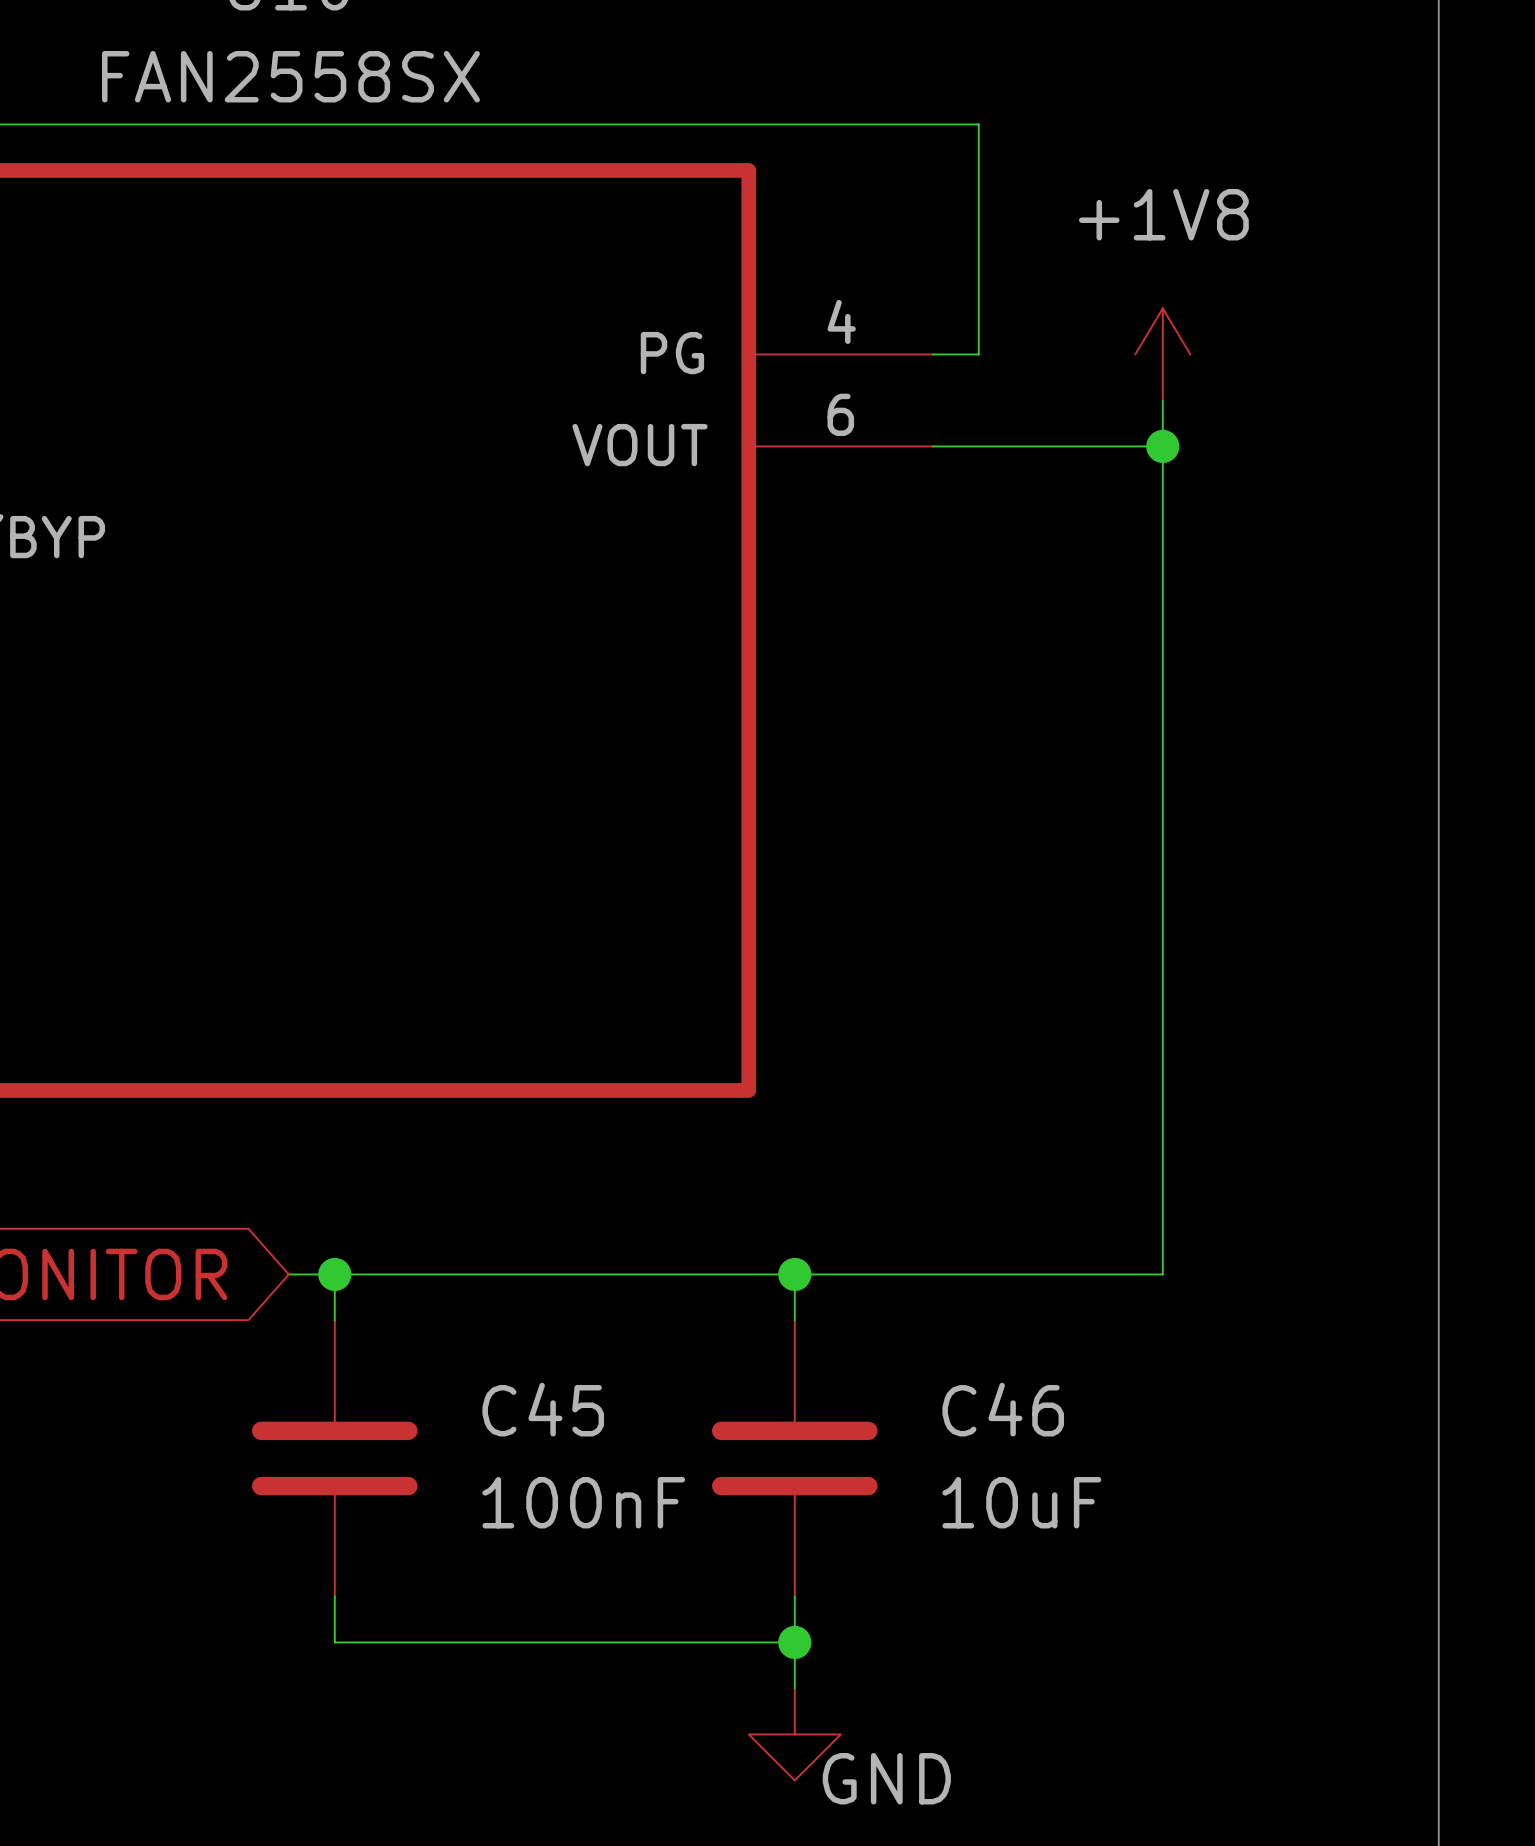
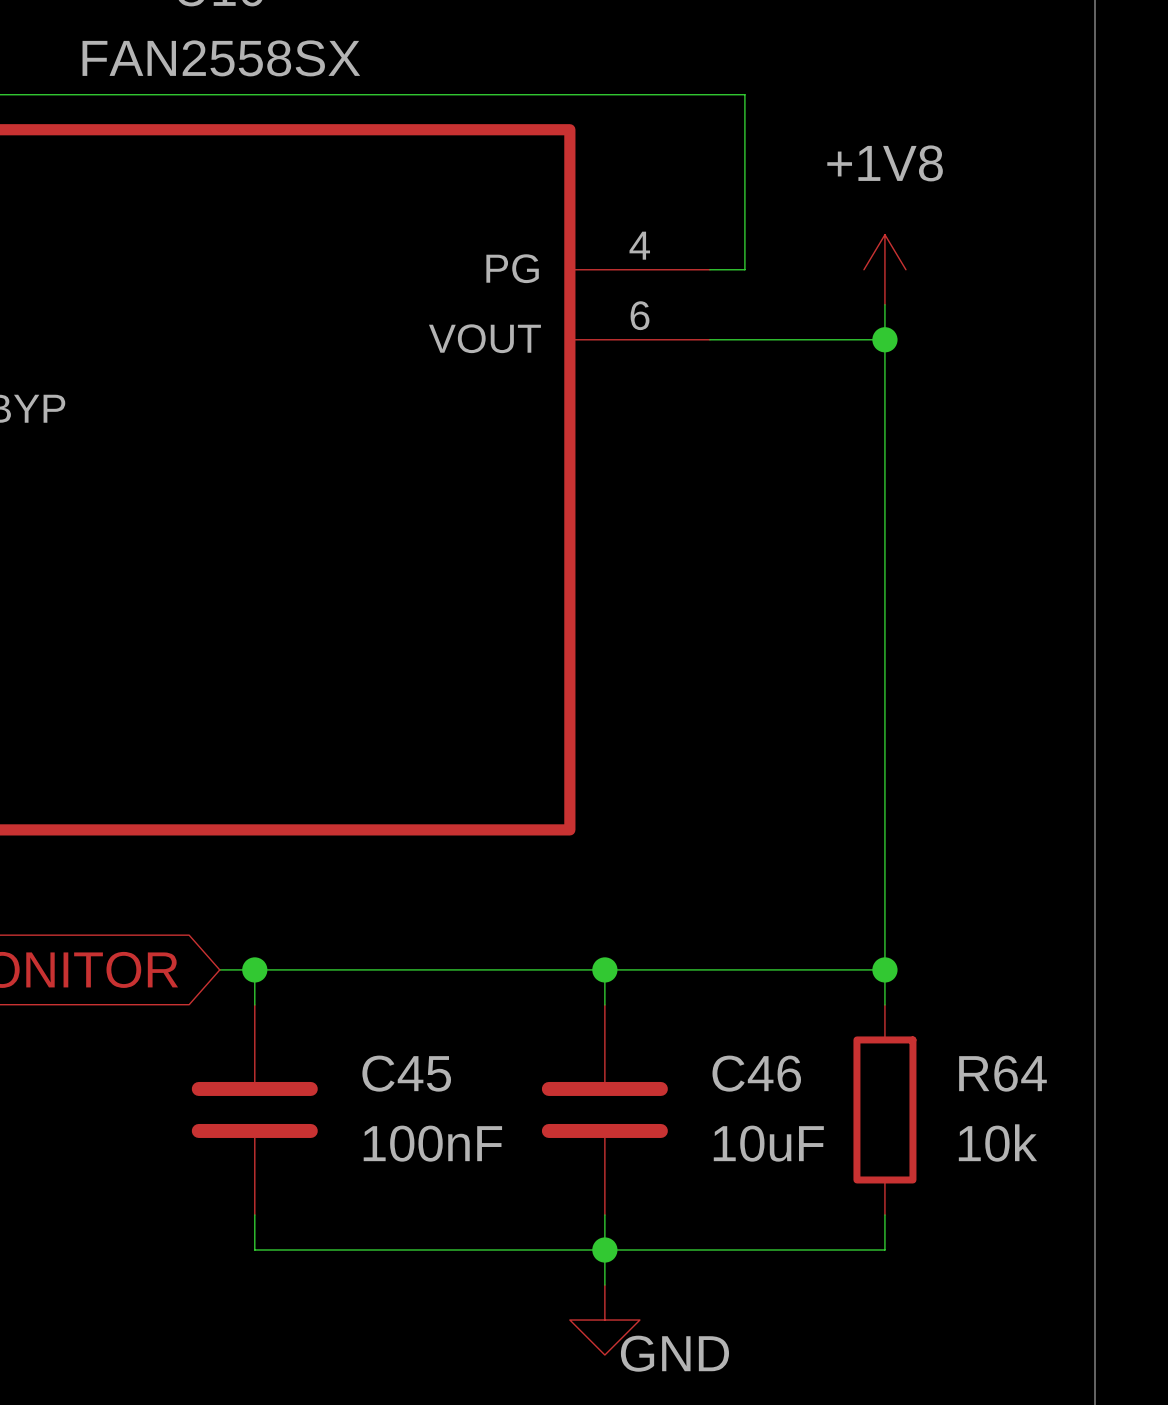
wire: none -> (884, 969) (884, 1004)
junction: none -> (884, 969)
R64: none -> 10k (884, 1109)
wire: none -> (884, 1214) (884, 1250) (604, 1250)

